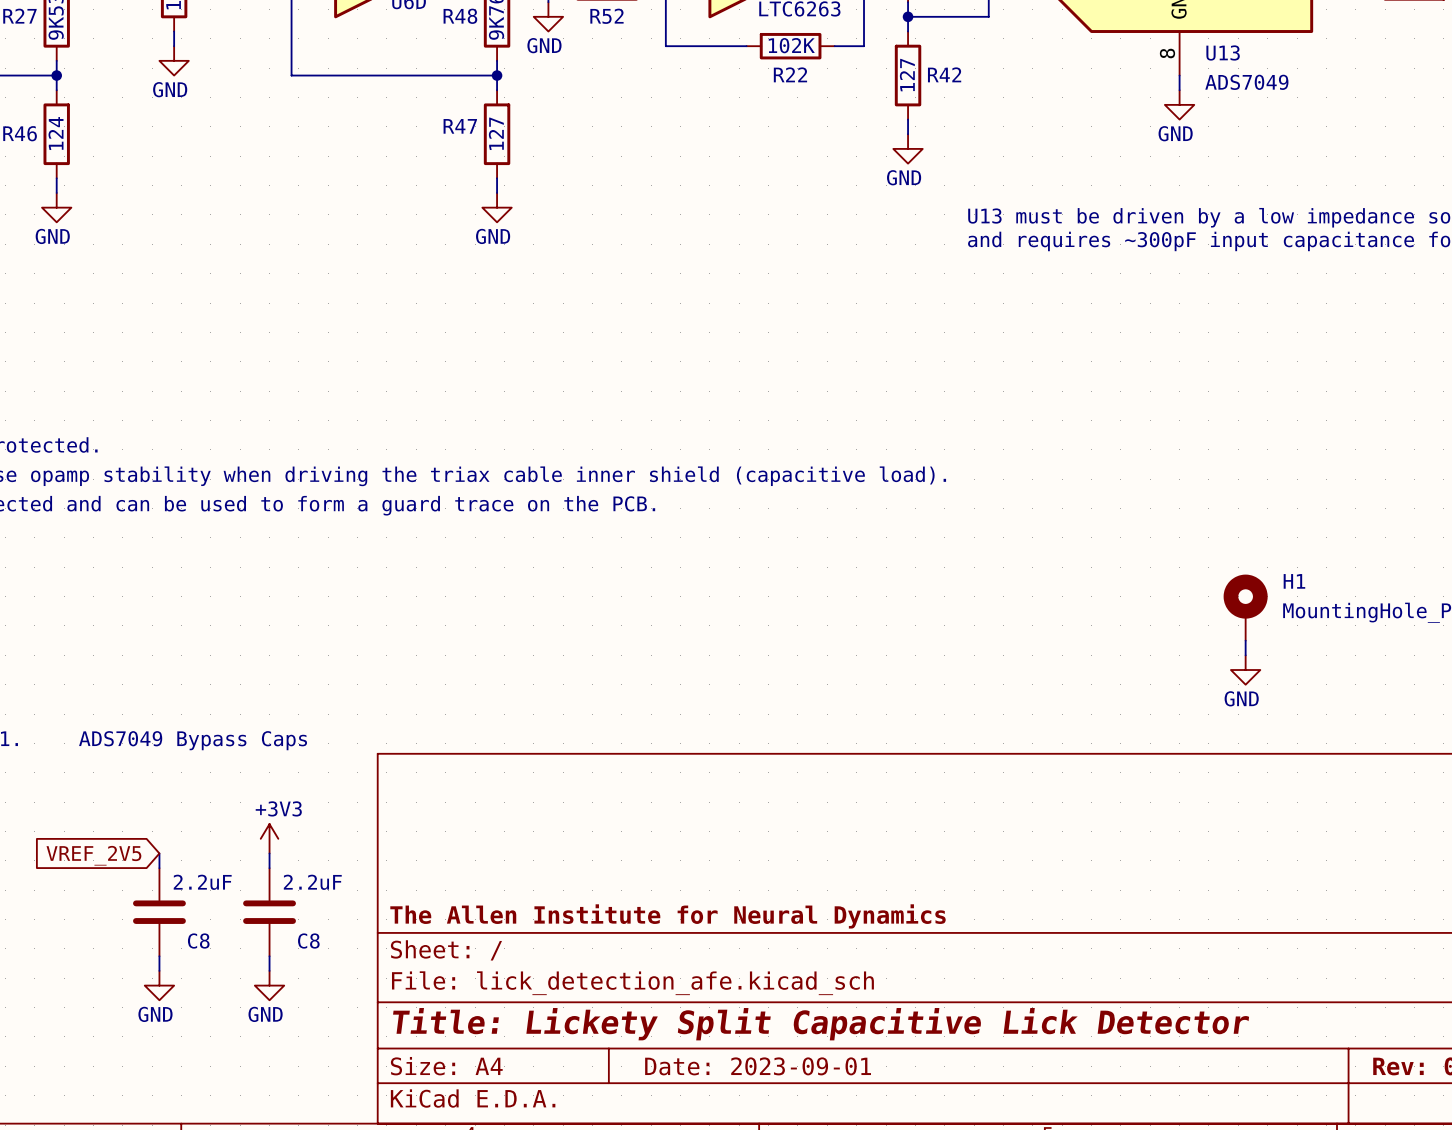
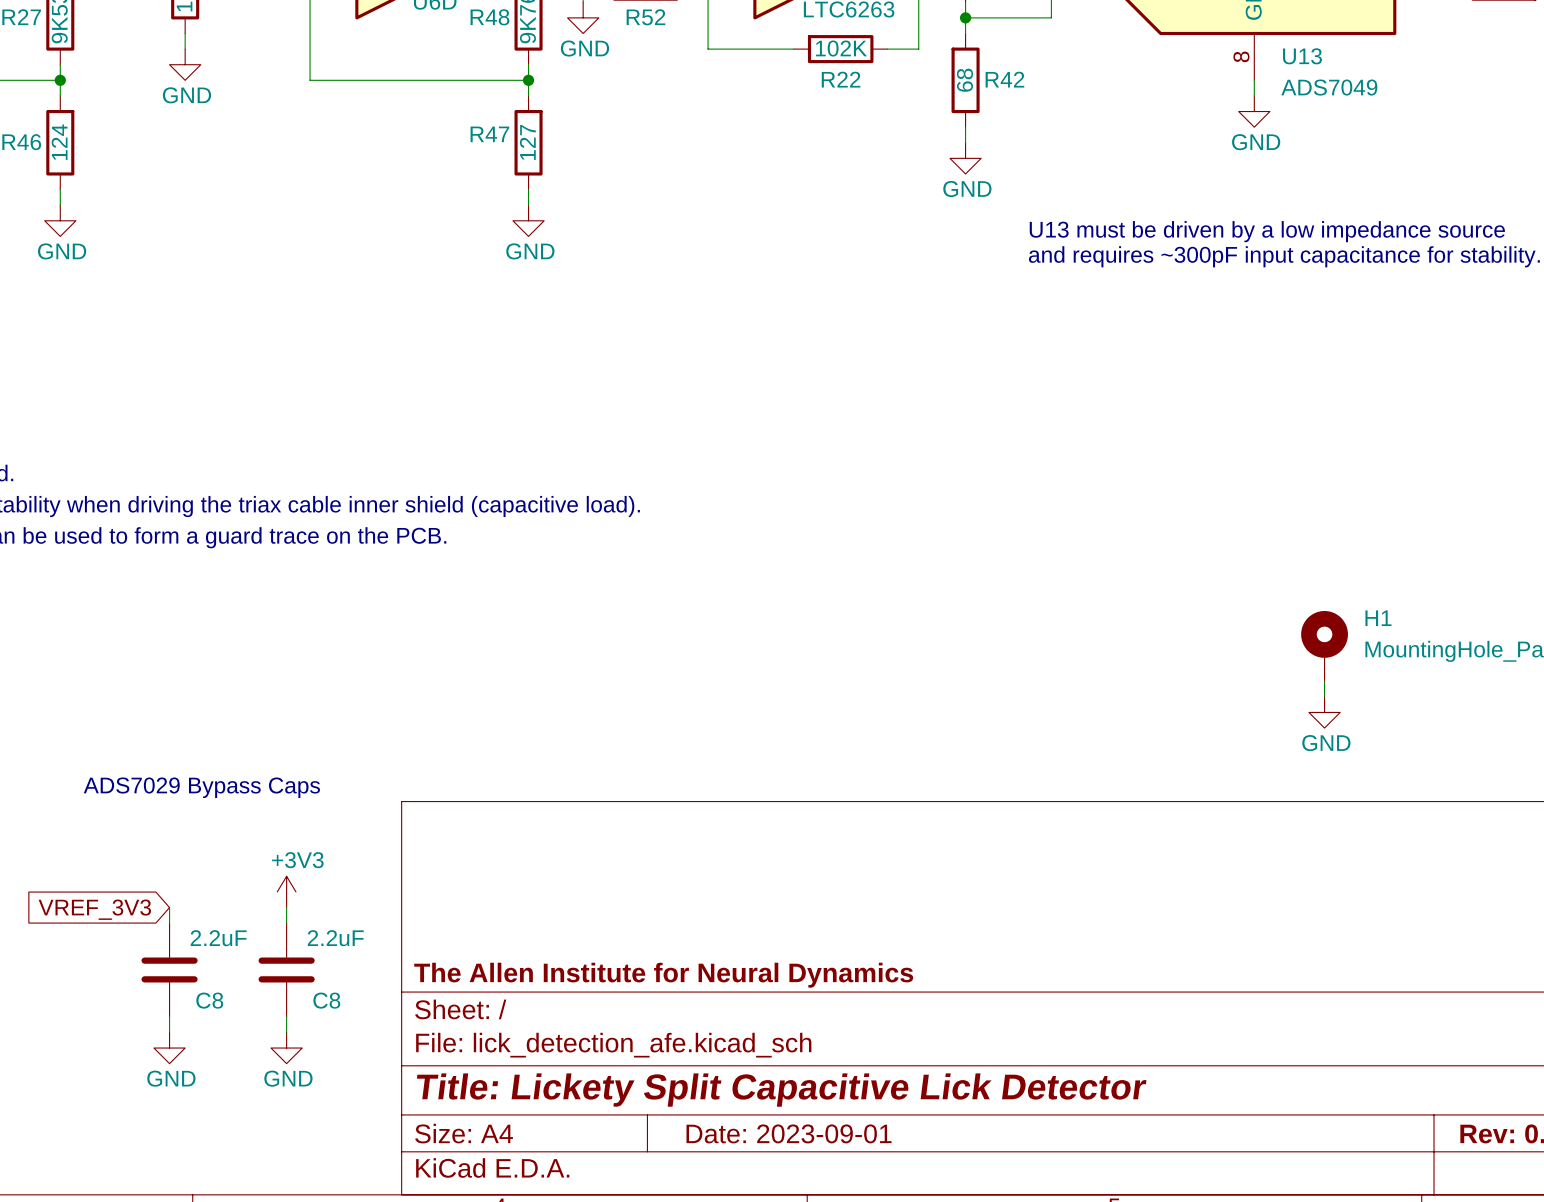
R42 value: 127 (907, 75) -> 68 (964, 80)
text: ADS7049 Bypass Caps (193, 740) -> ADS7029 Bypass Caps (201, 787)
global label: VREF_2V5 (93, 855) -> VREF_3V3 (94, 909)

